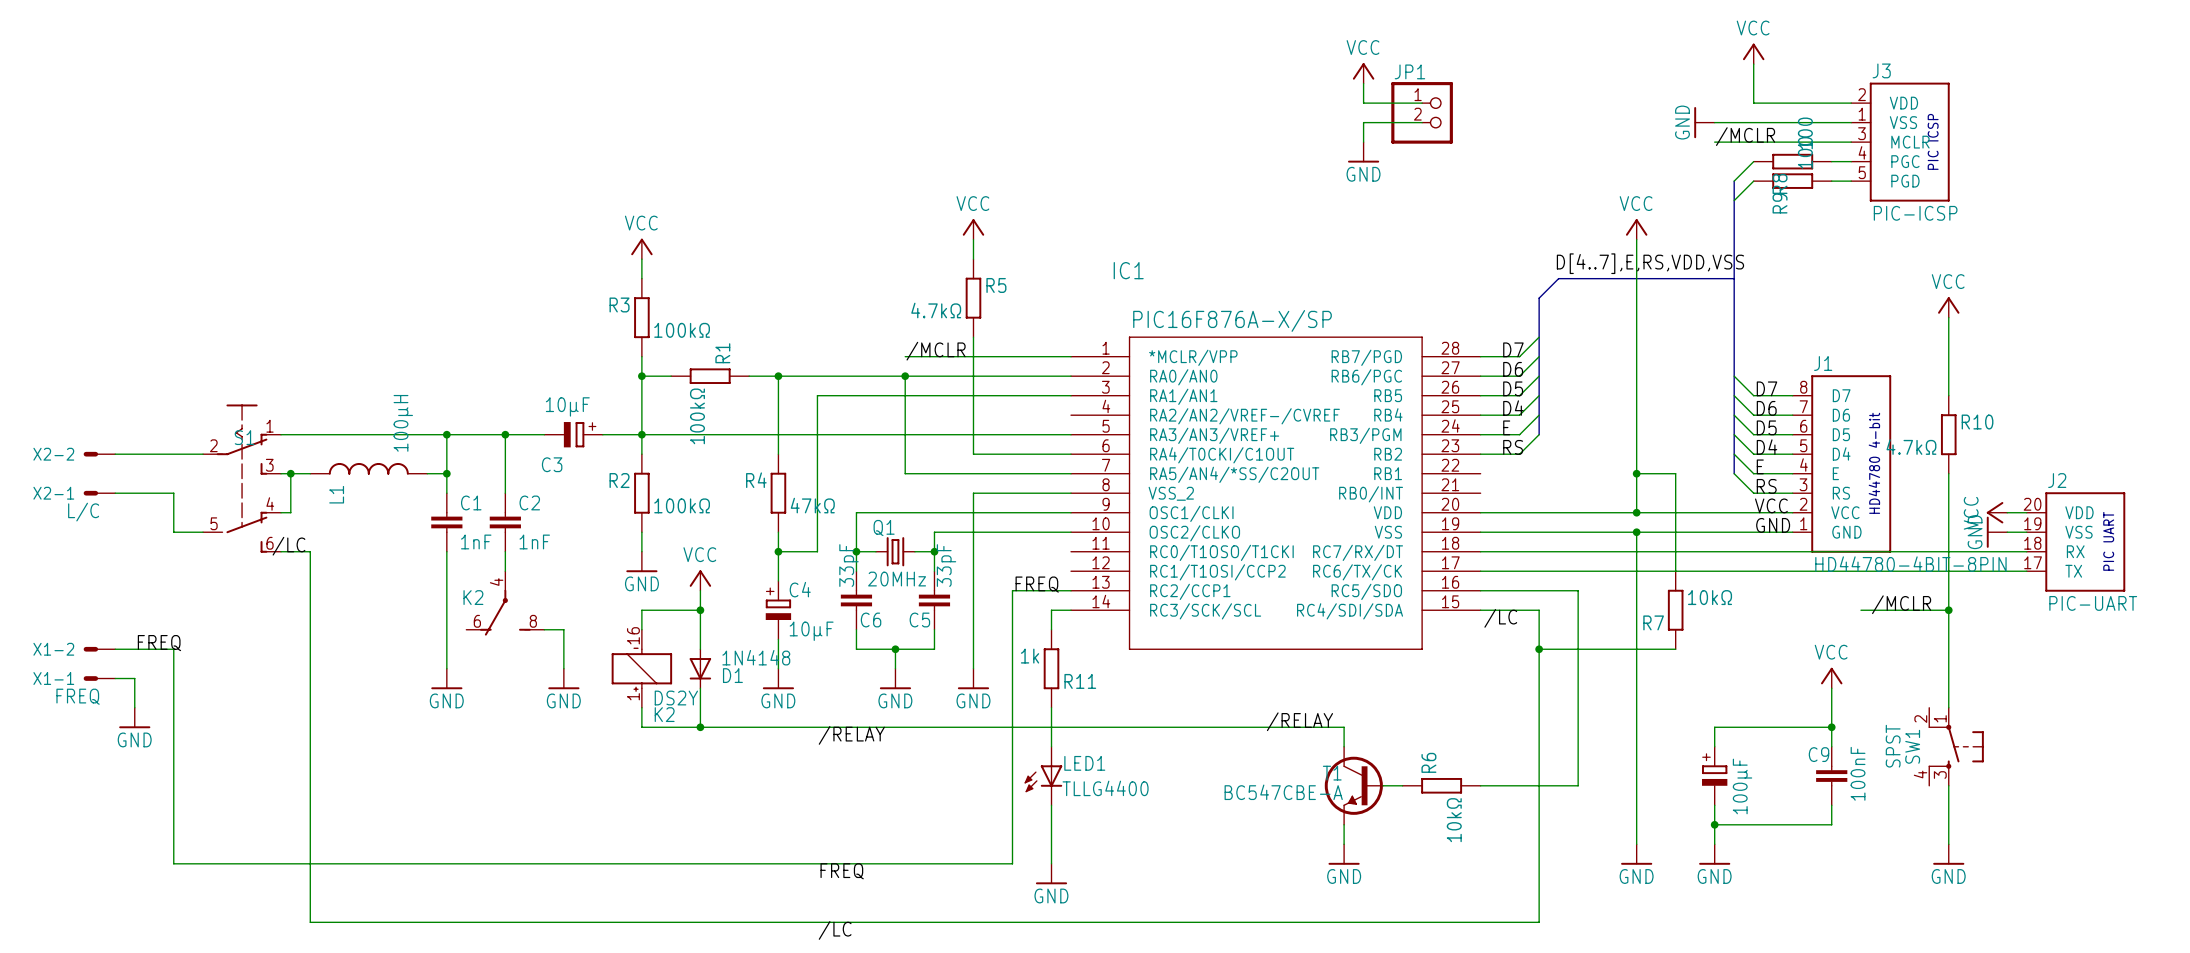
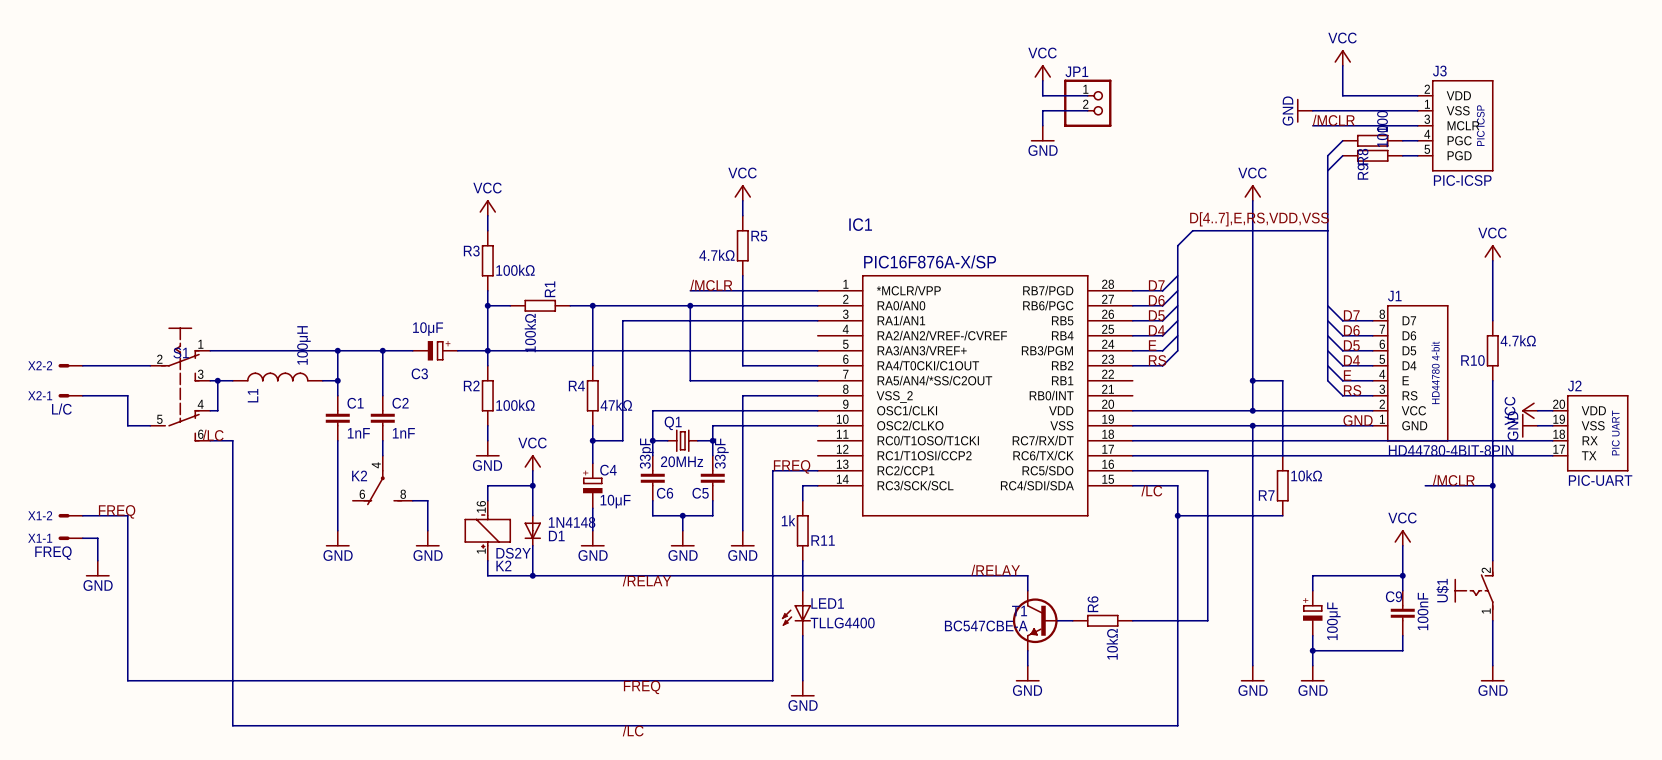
R10 name position: R10 (1977, 422) -> R10 (1472, 360)
R10 value position: 4.7kΩ (1911, 447) -> 4.7kΩ (1518, 340)
label: VCC (1771, 505) -> none
U$1: none -> (1474, 590)
SW1: SPST (1956, 746) -> none

